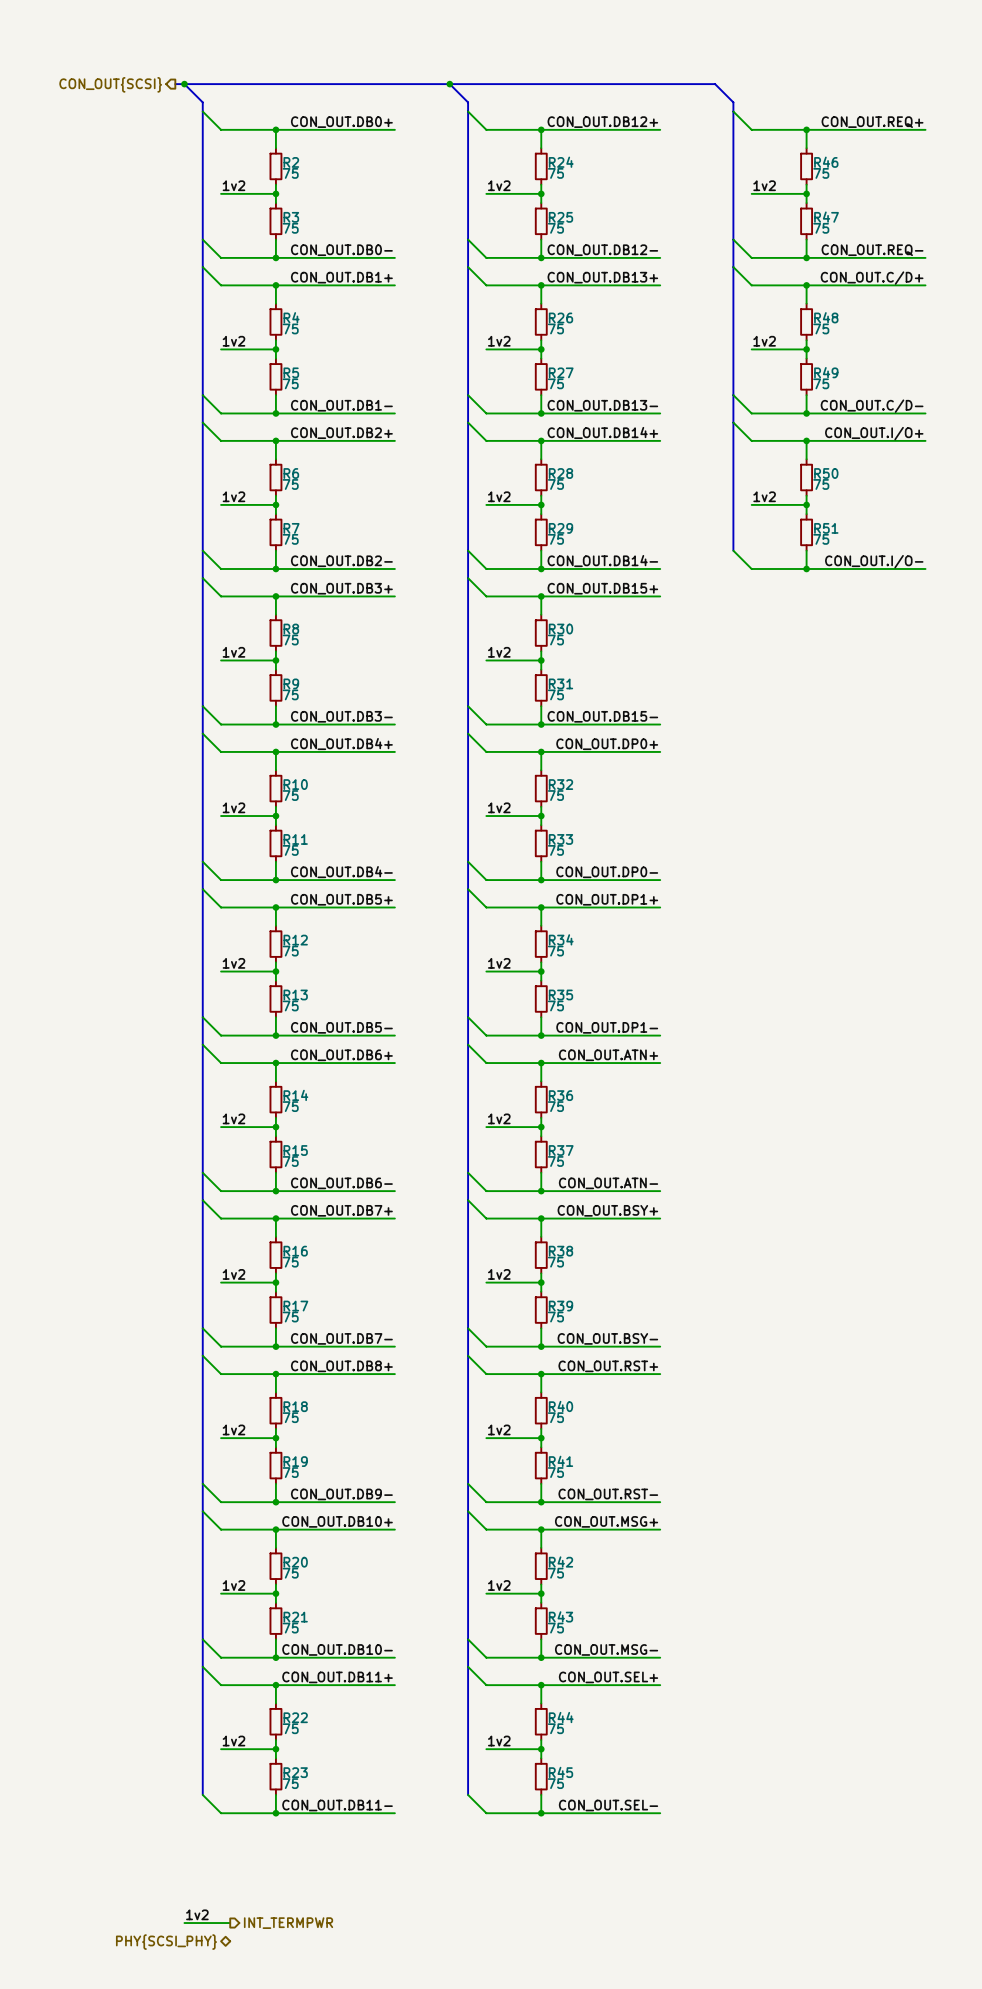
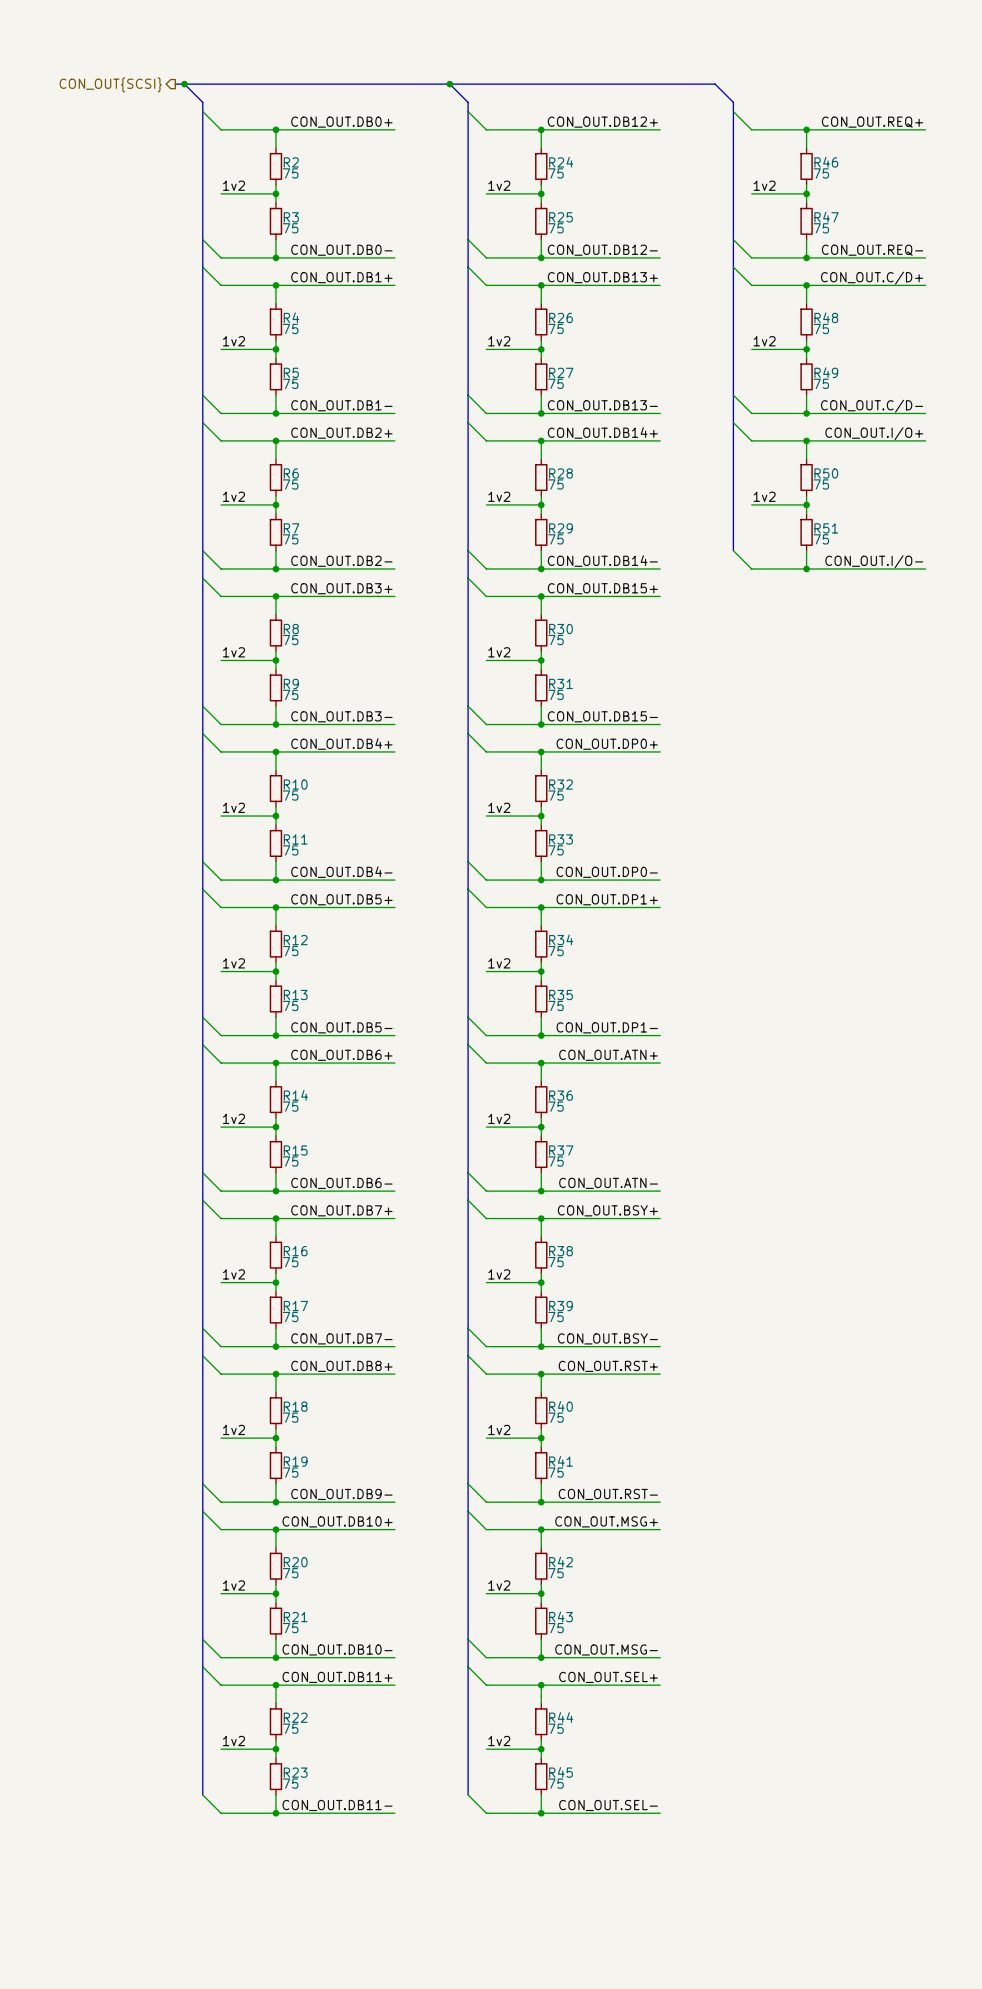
label: 1v2 (197, 1914) -> none
wire: (184, 1923) (230, 1923) -> none
hierarchical label: INT_TERMPWR (288, 1923) -> none
hierarchical label: PHY{SCSI_PHY} (166, 1942) -> none

